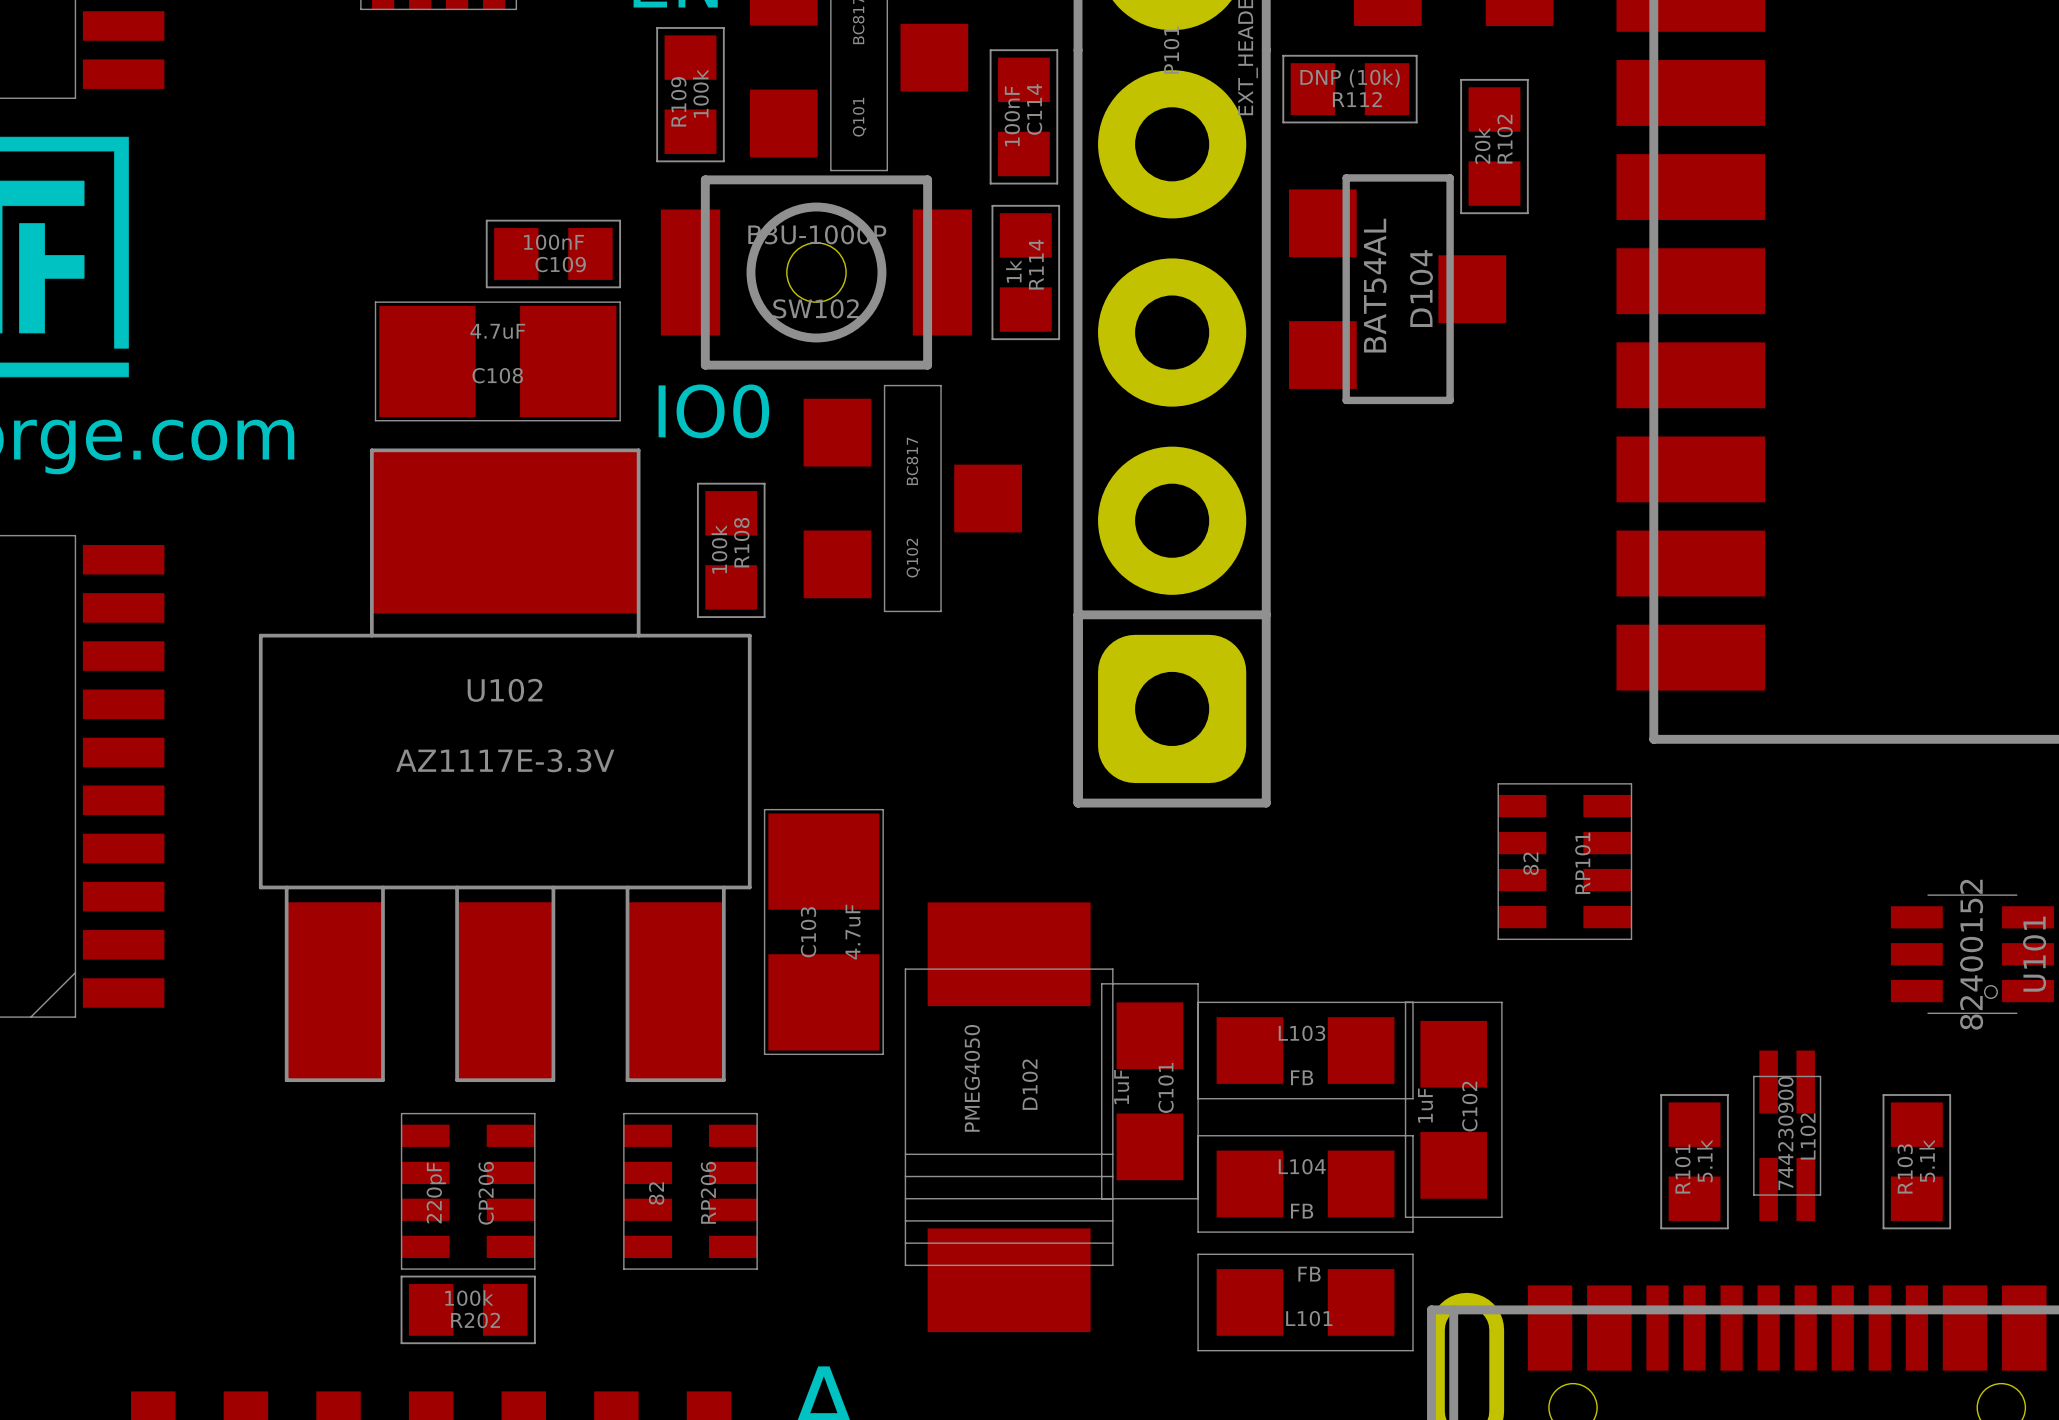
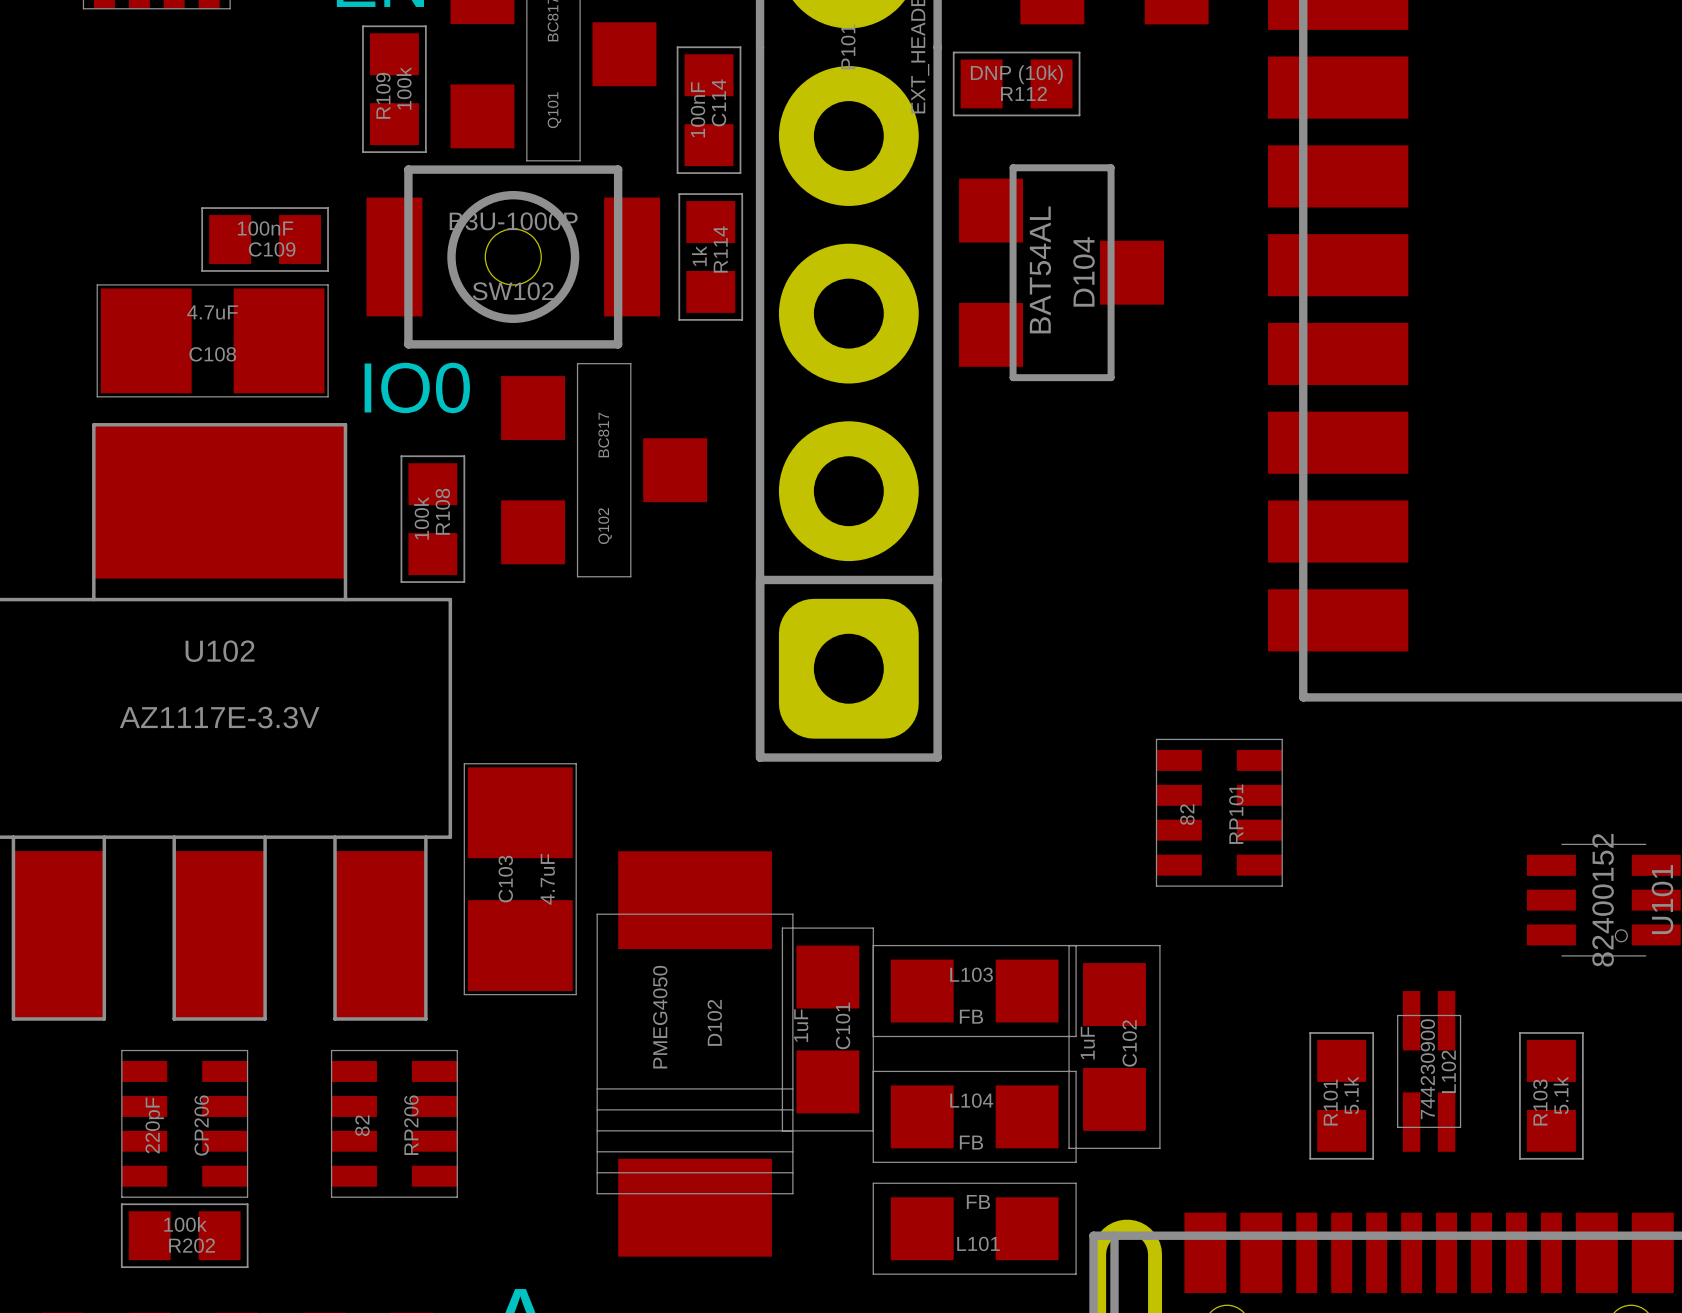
R102: 20k (1494, 146) -> none

